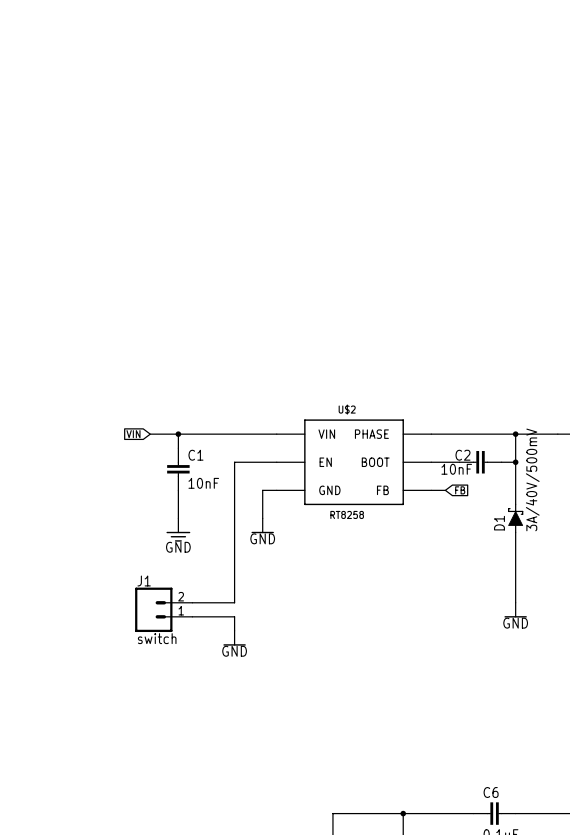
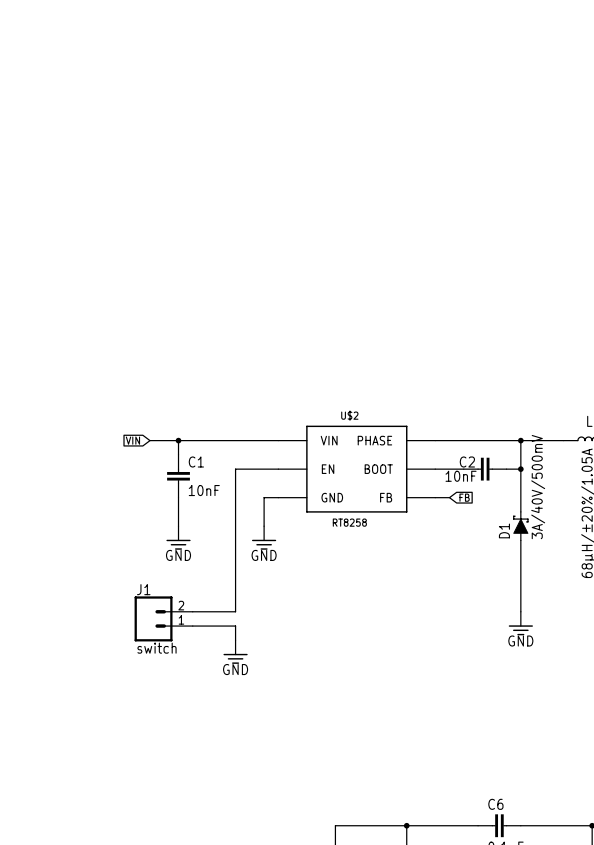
power symbol shape: [251, 518, 274, 534] -> [251, 526, 277, 550]
power symbol shape: [504, 602, 527, 618] -> [508, 611, 533, 636]
power symbol shape: [223, 630, 246, 646] -> [223, 640, 248, 664]

